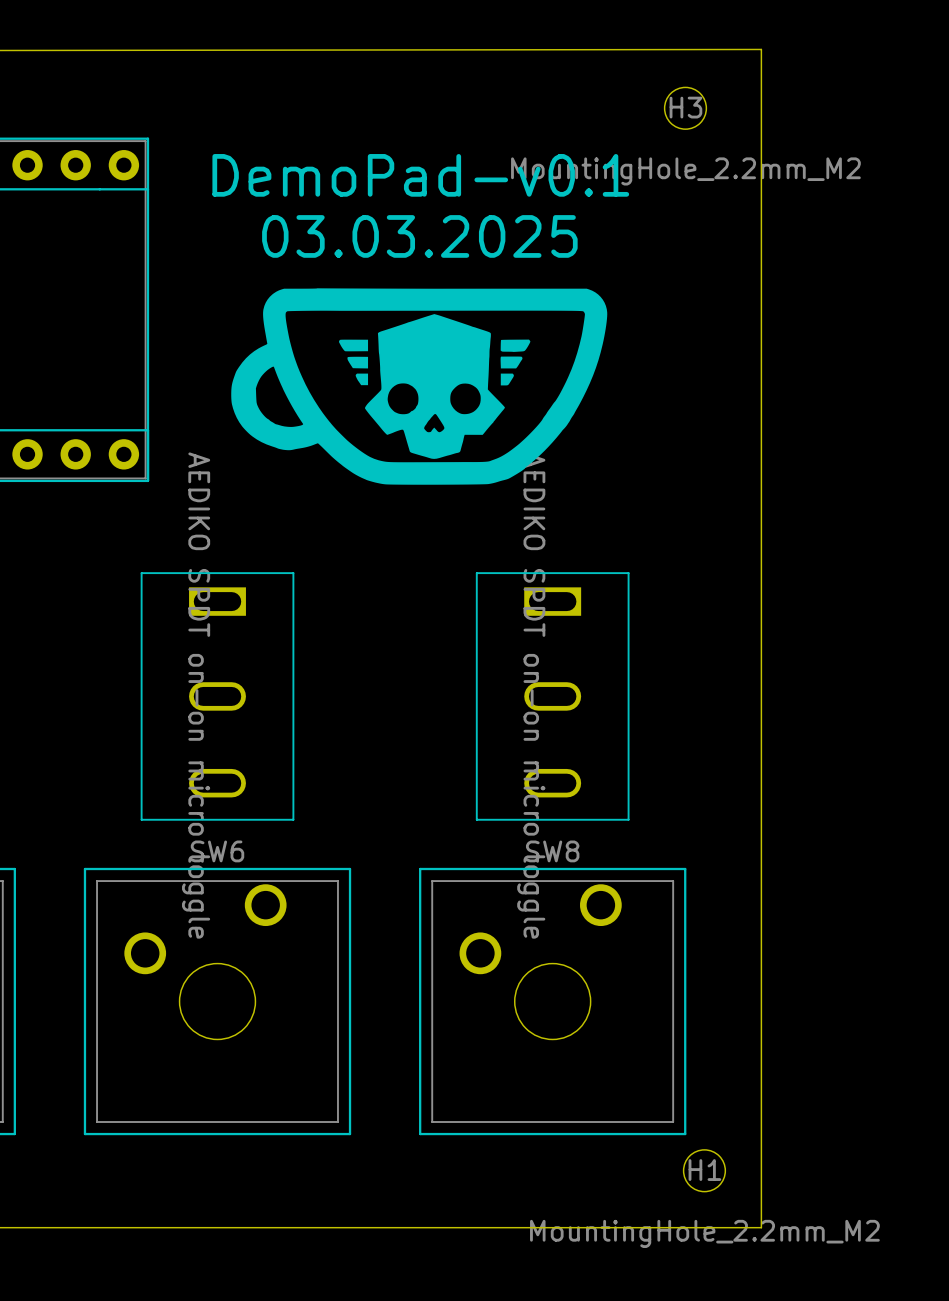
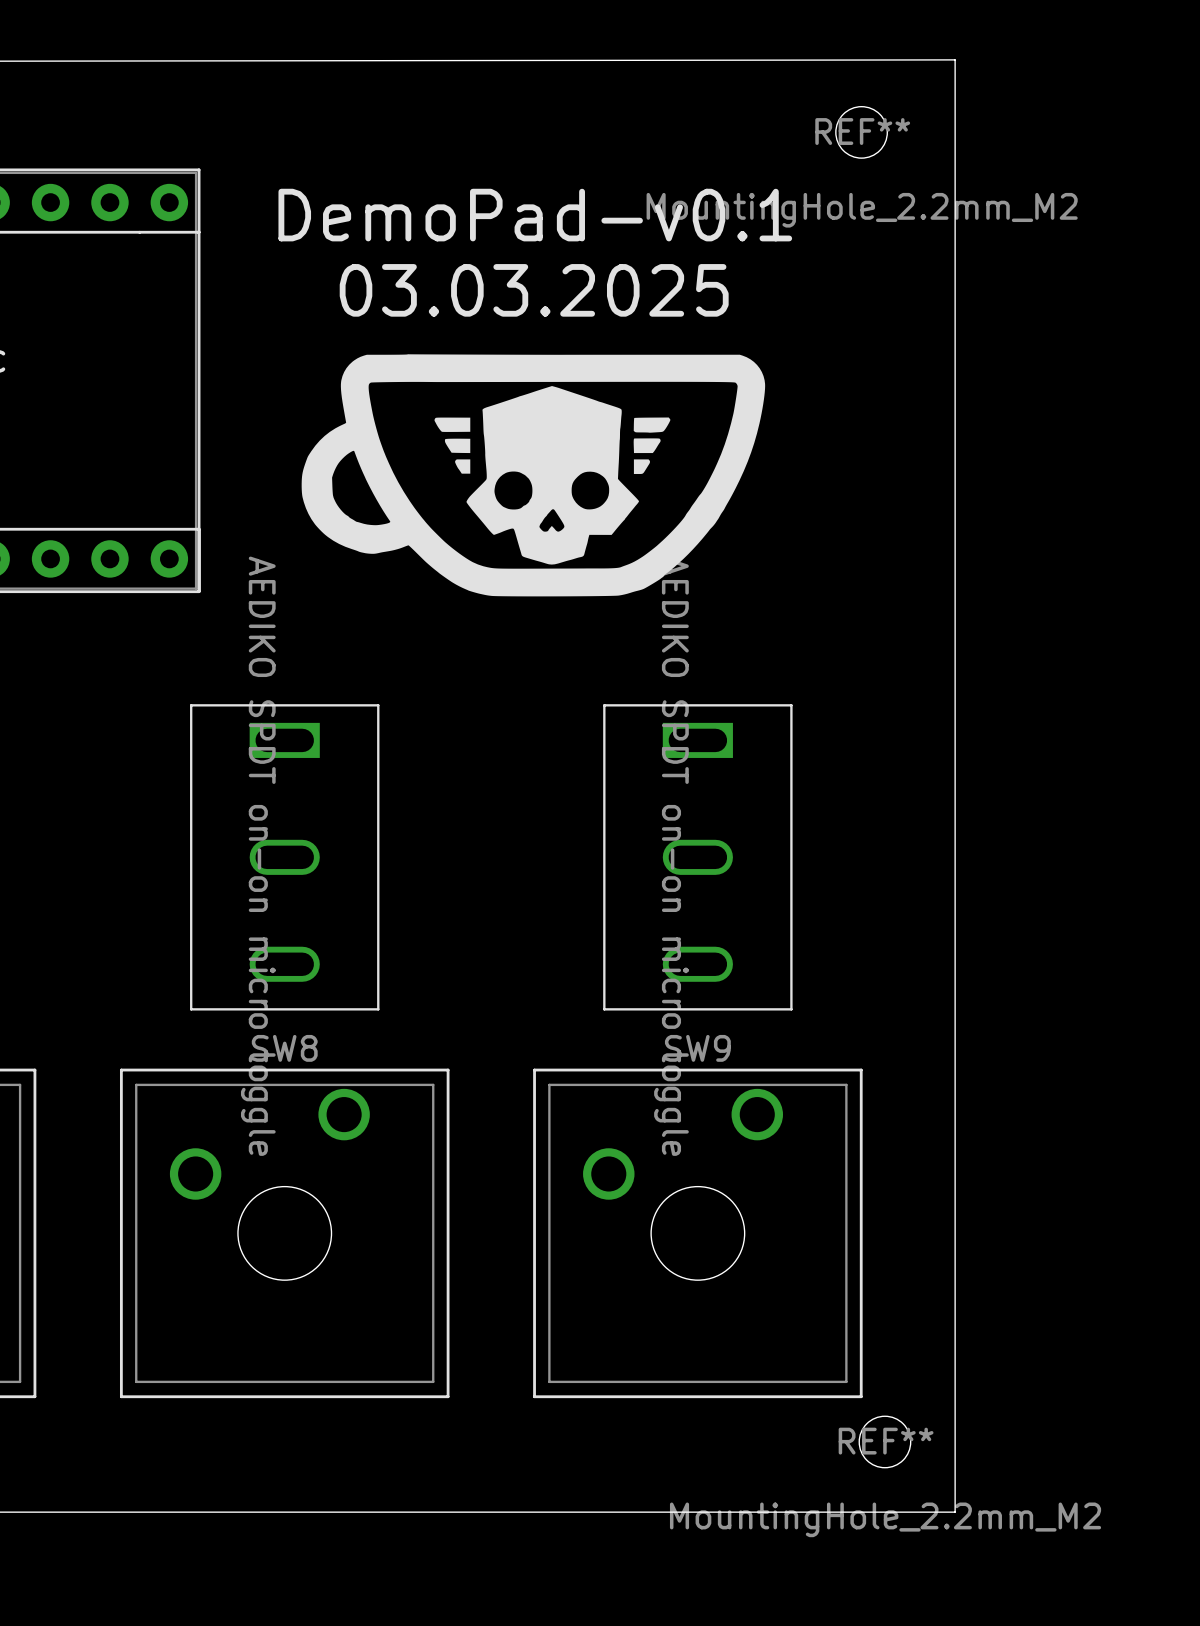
H3 name: H3 (685, 107) -> REF** (862, 131)
SW6 name: SW6 (217, 851) -> SW8 (284, 1048)
SW8 name: SW8 (552, 851) -> SW9 (697, 1048)
H1 name: H1 (704, 1170) -> REF** (886, 1441)

